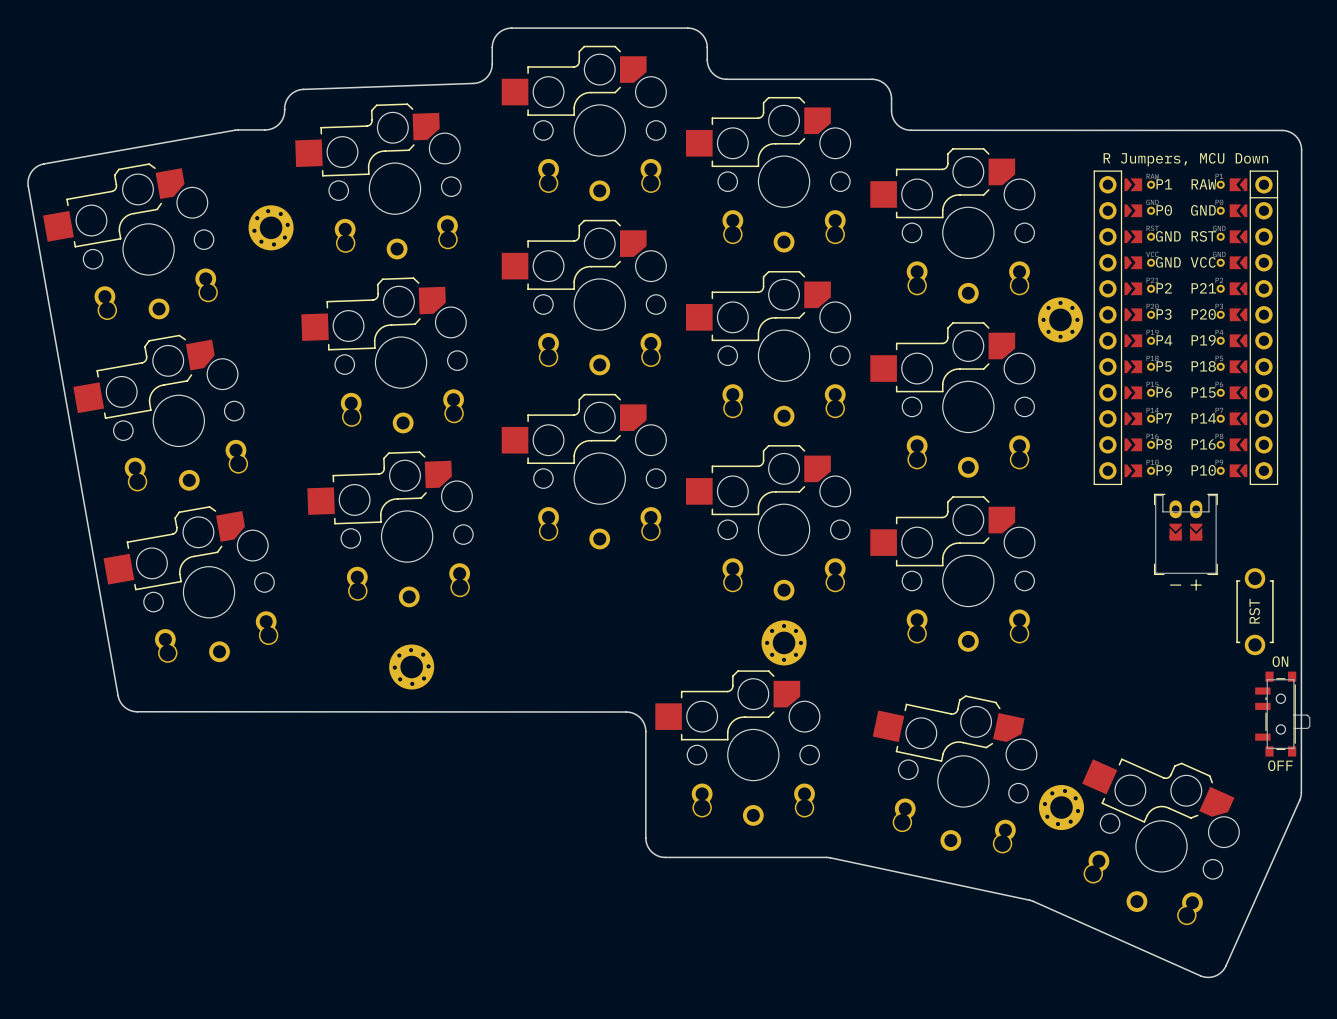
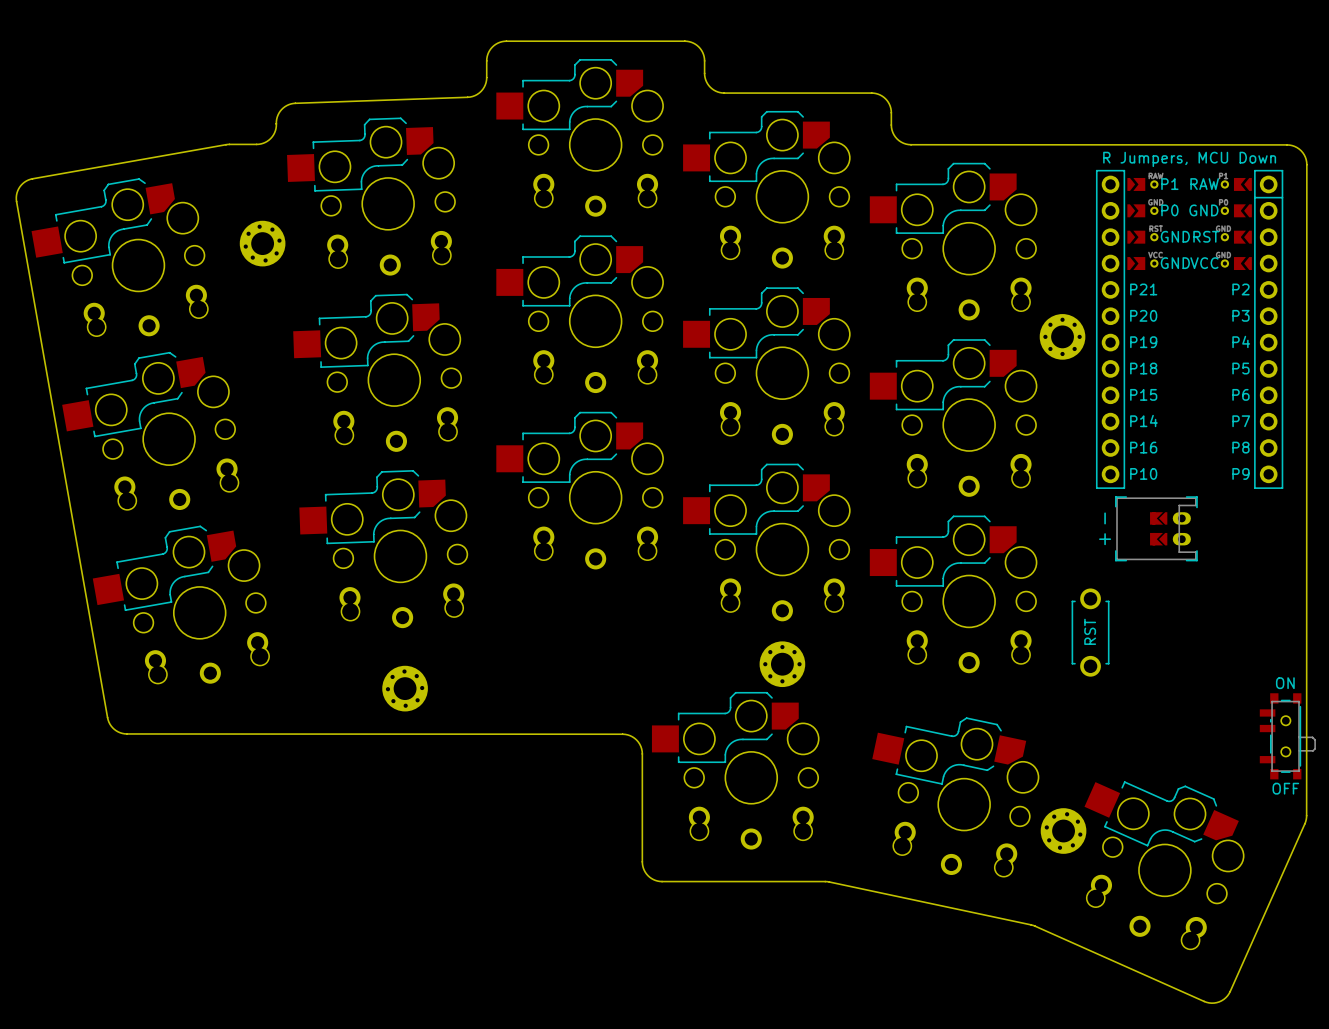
part: none -> (1189, 329)
part: (1185, 327) -> none
part rotation: 0° (1185, 542) -> 90° clockwise (1148, 528)
part position: (1255, 611) -> (1090, 632)

